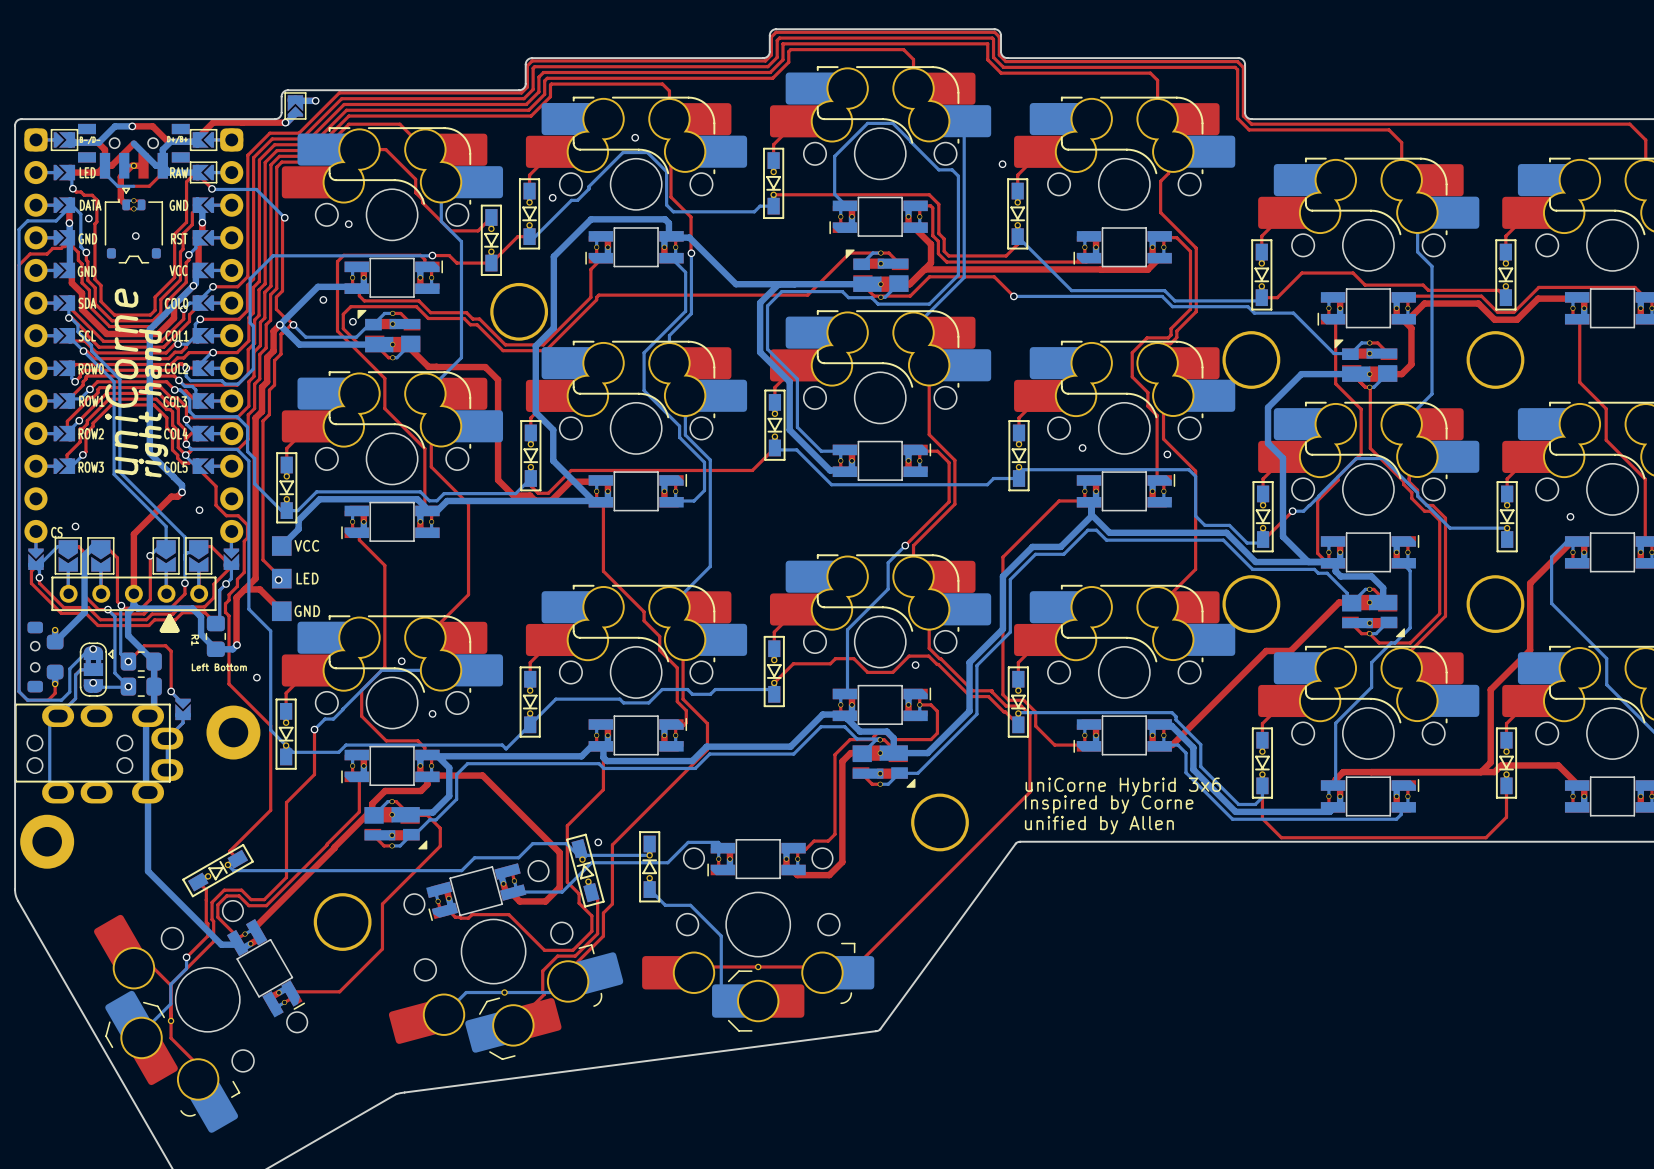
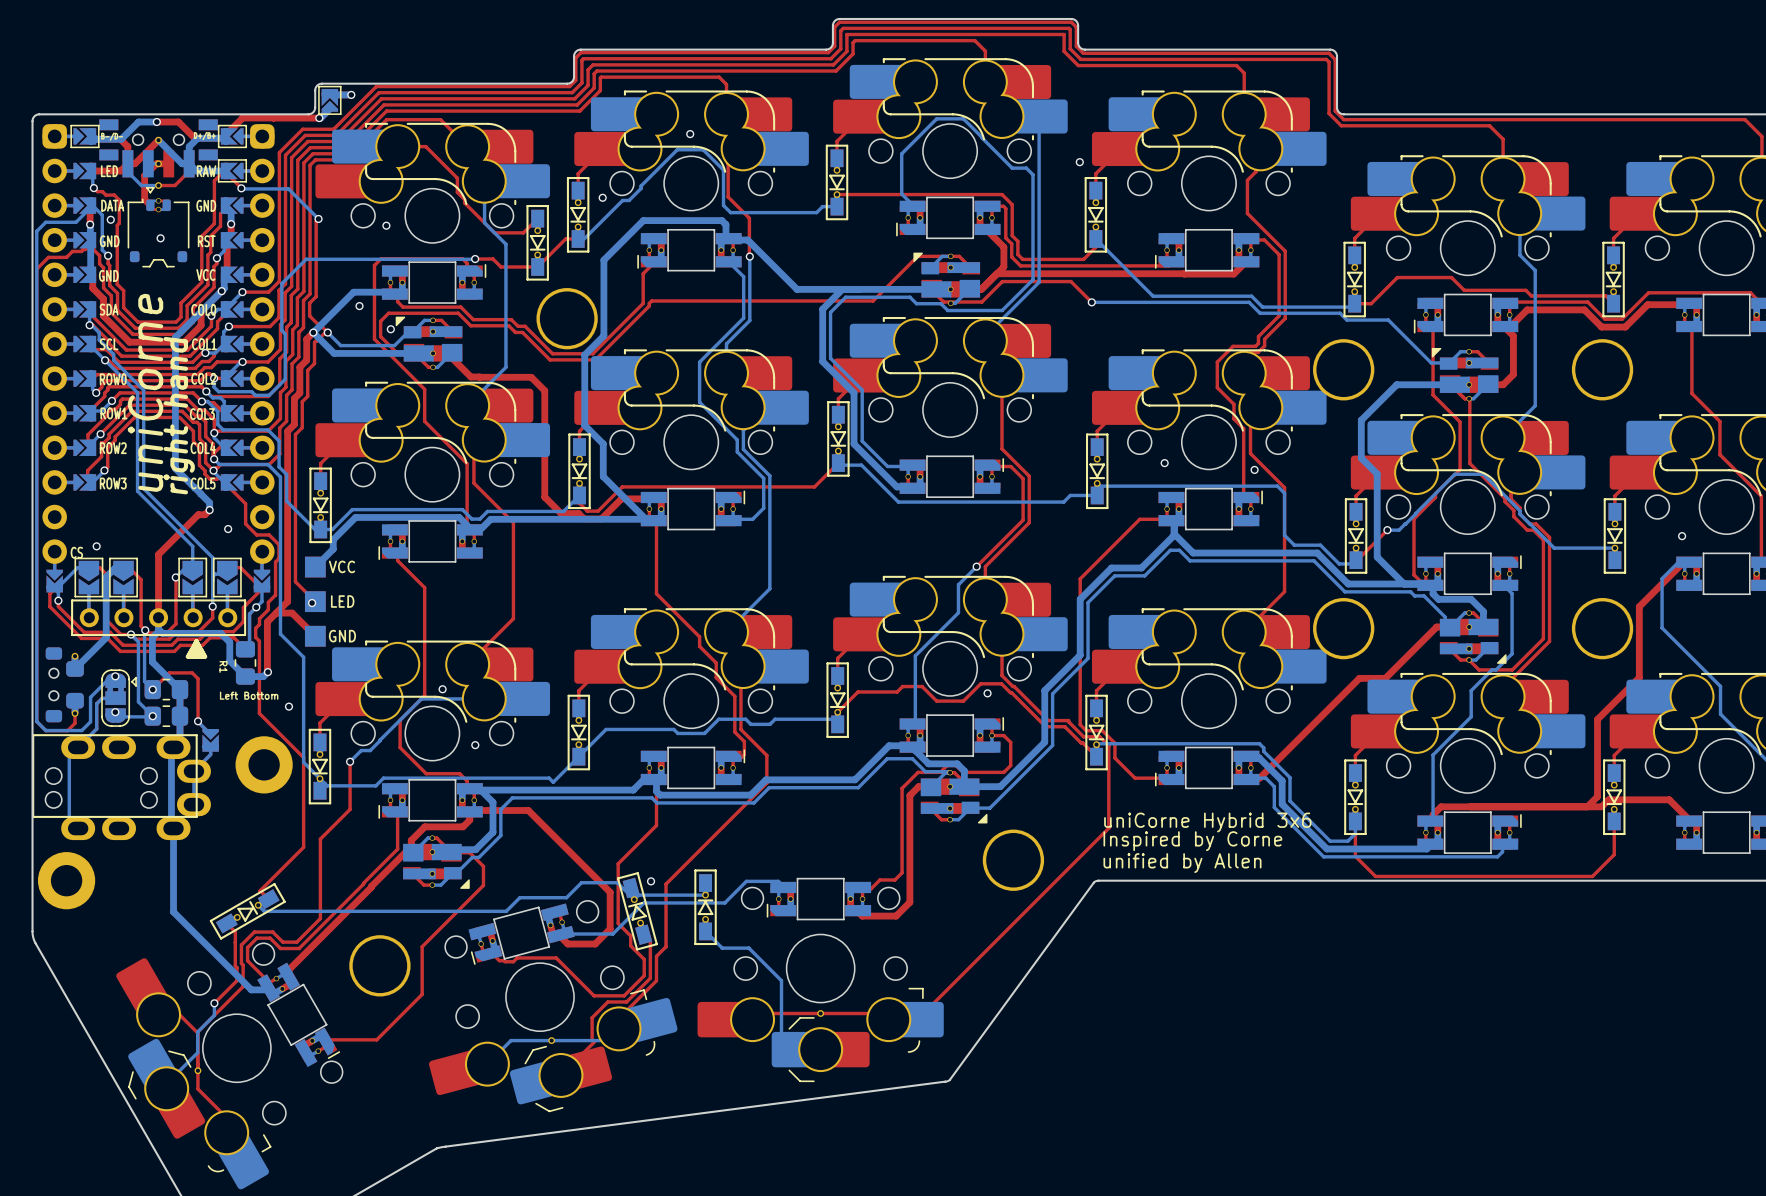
part footprint: [78, 123, 190, 179] -> [99, 119, 218, 189]

